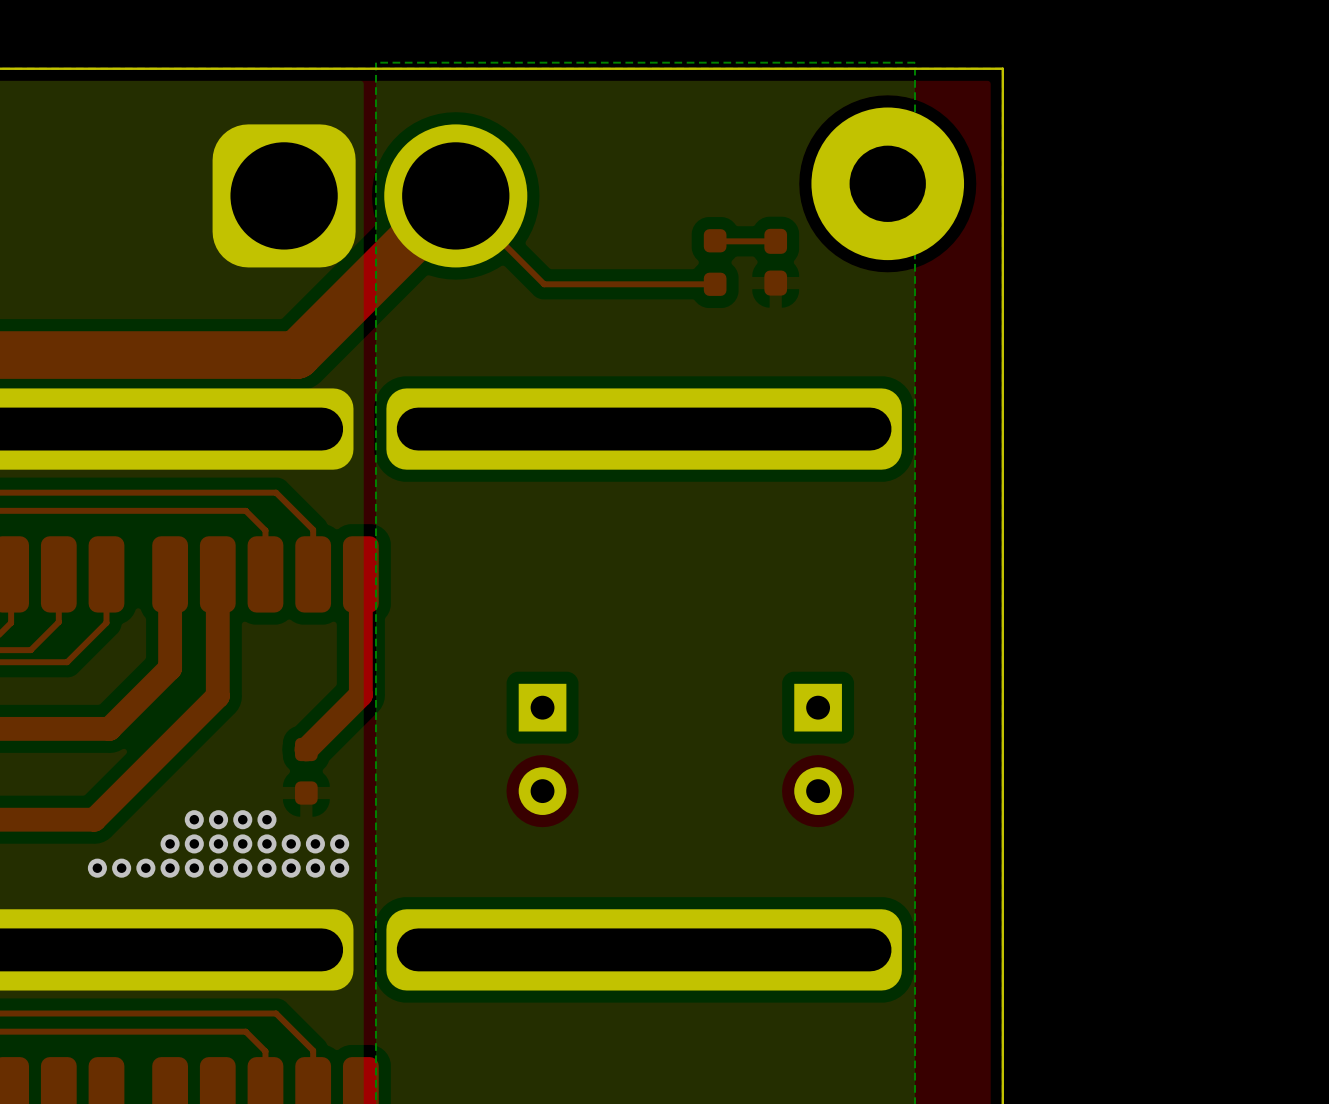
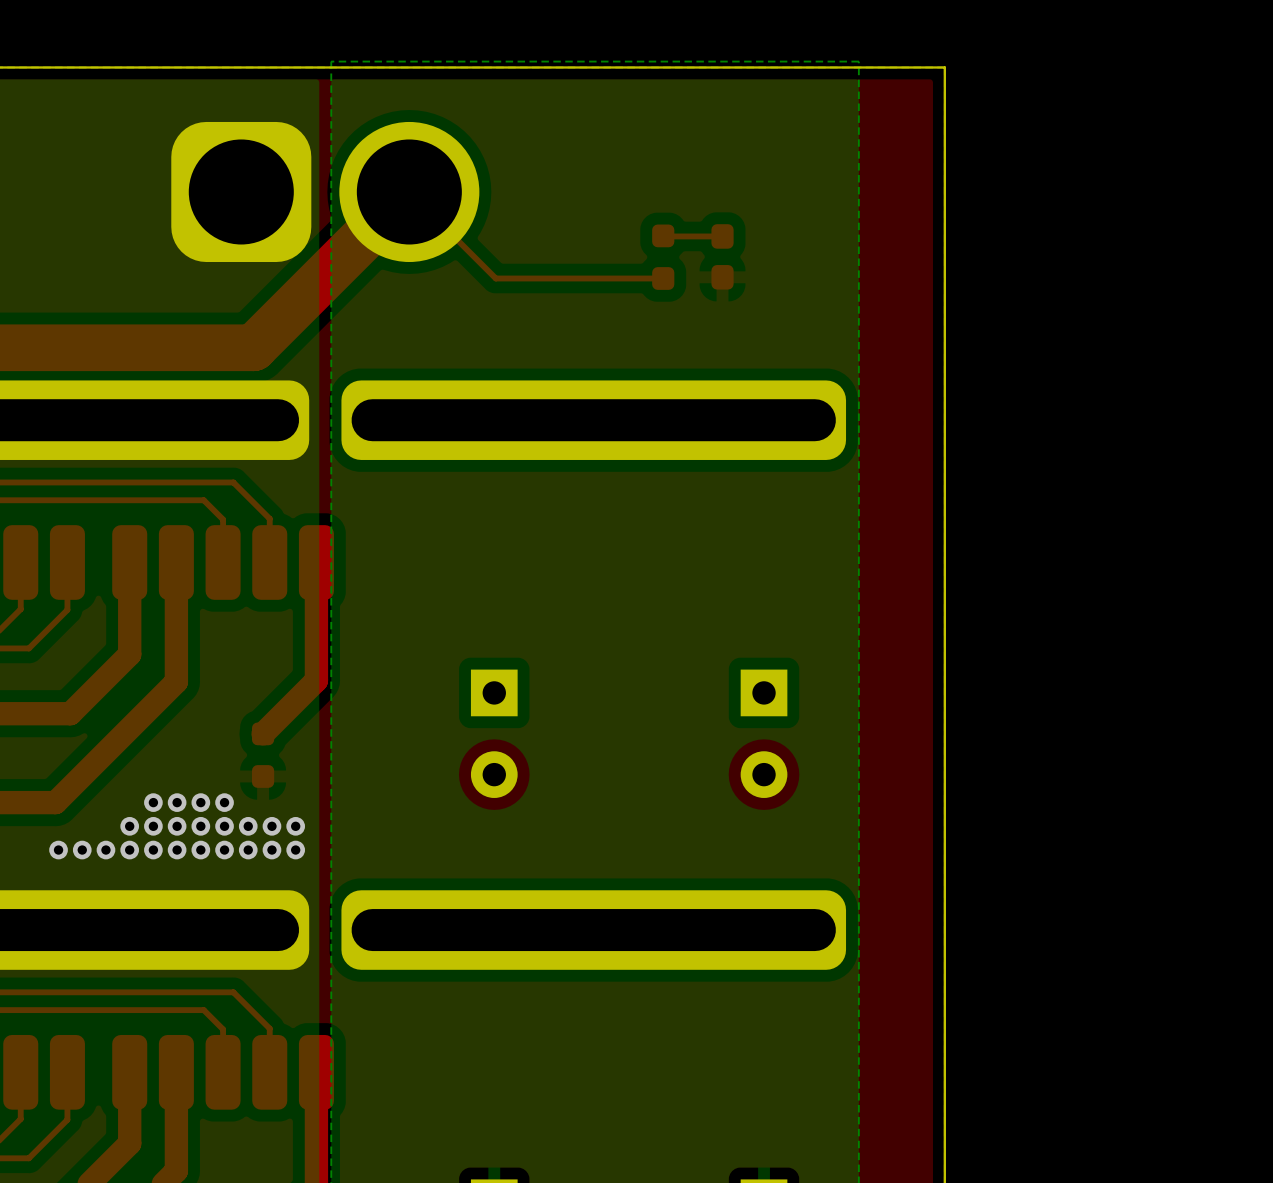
part: (887, 183) -> none

